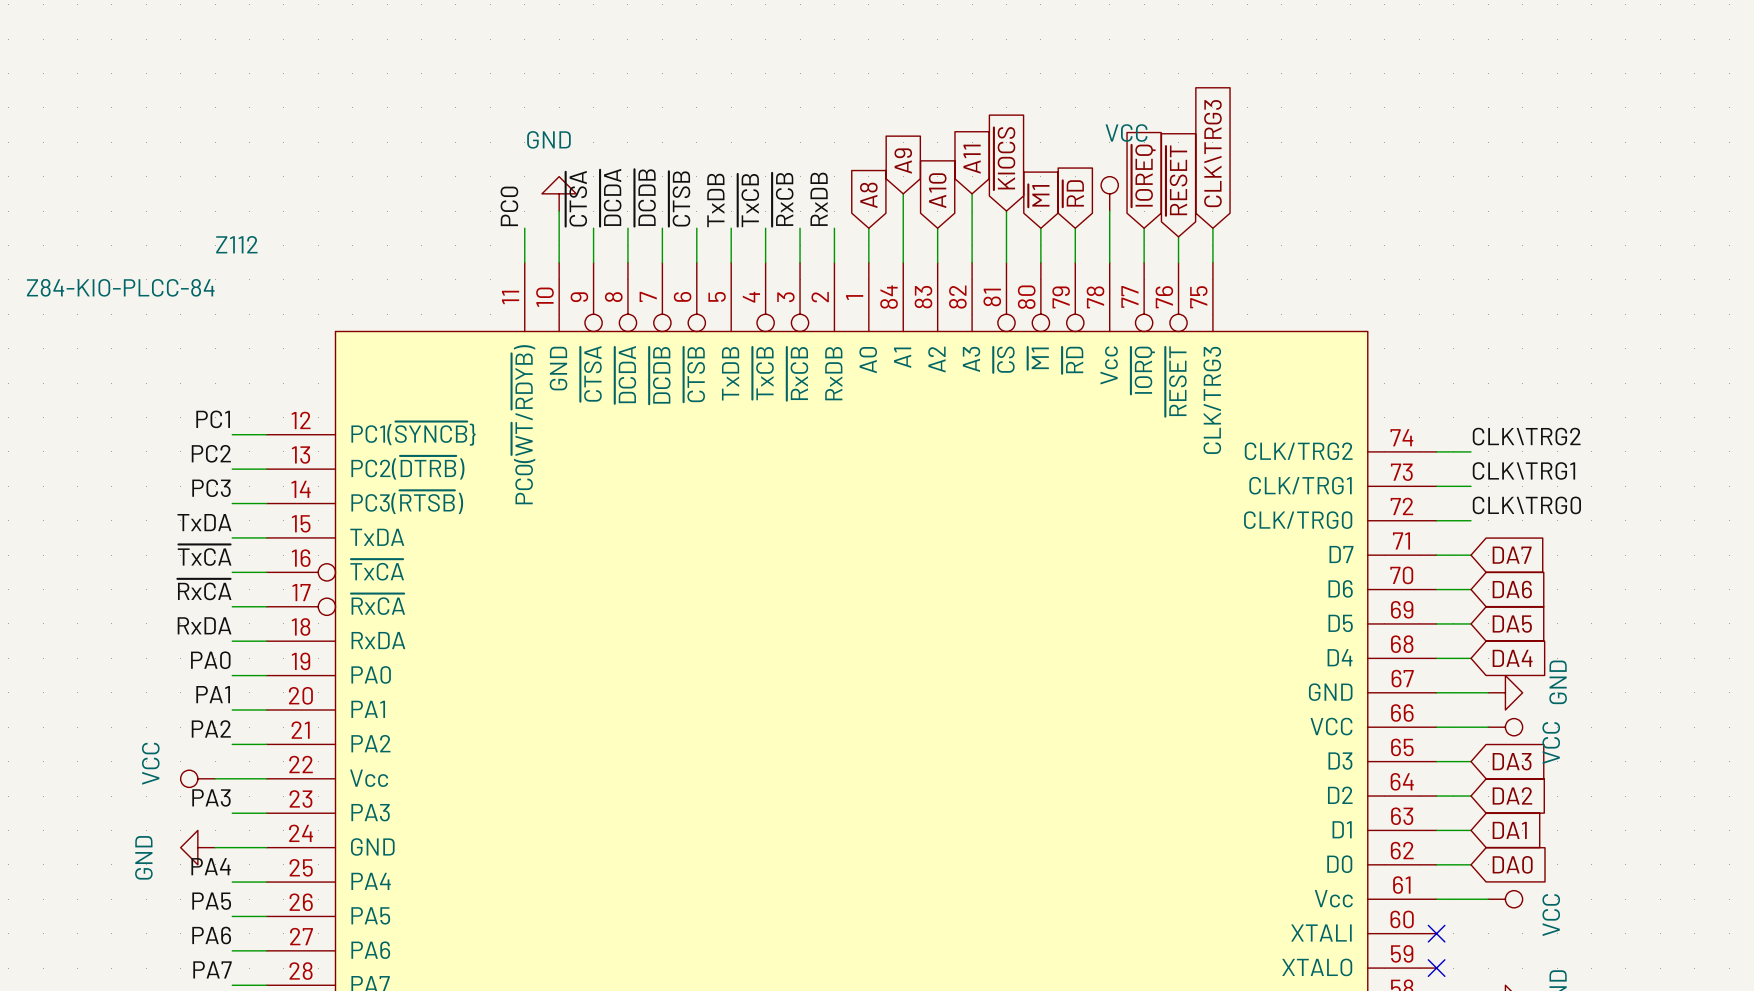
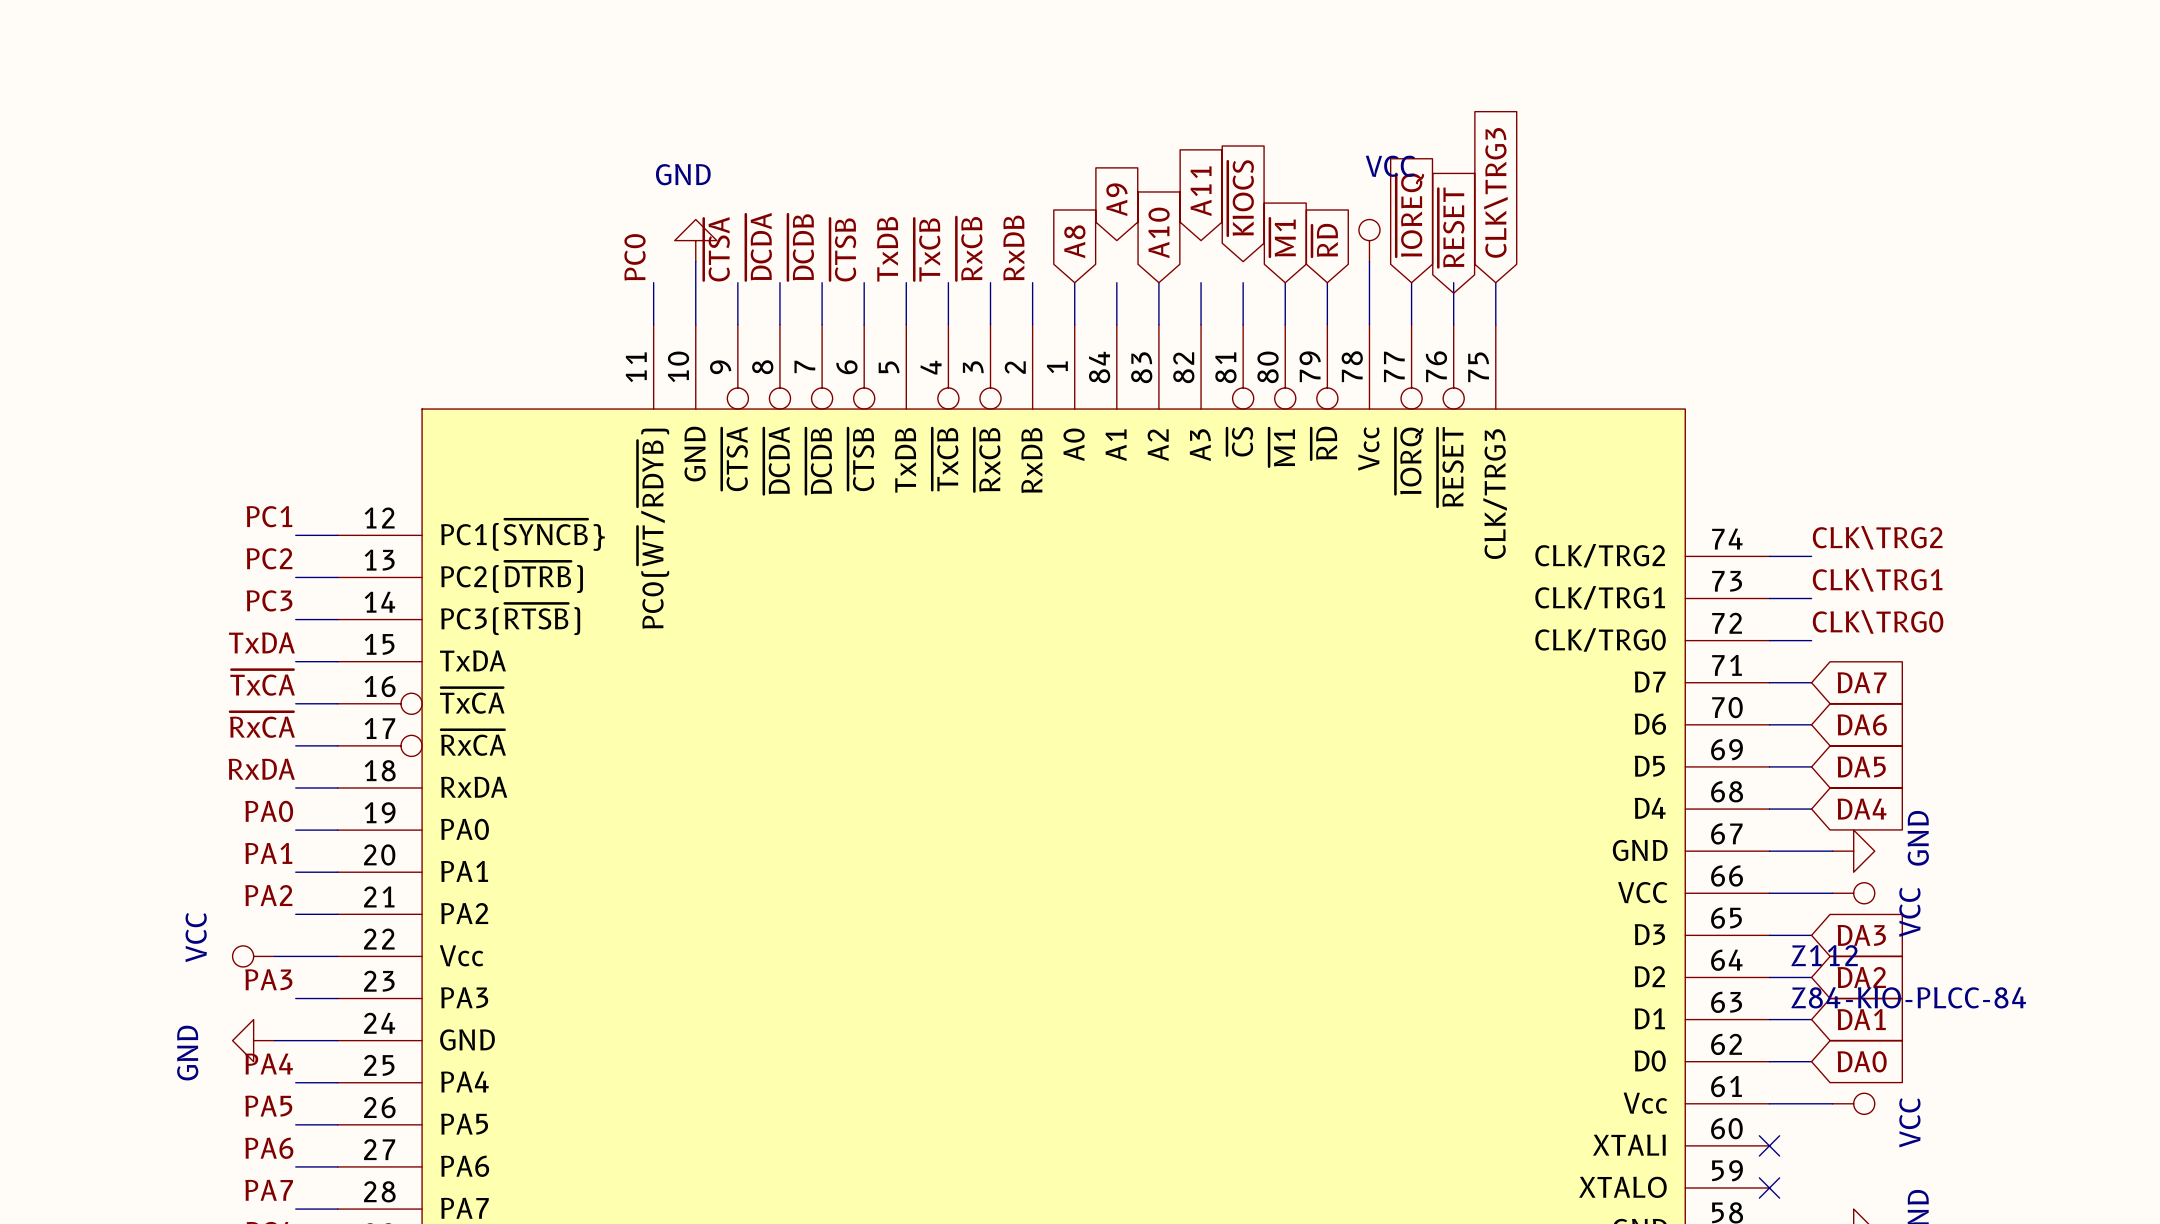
wire: (903, 193) (903, 228) -> none
wire: (972, 193) (972, 228) -> none
wire: (1006, 211) (1006, 228) -> none
wire: none -> (1453, 282) (1453, 293)
Z112 name position: Z112 (236, 244) -> Z112 (1824, 955)
Z112 value position: Z84-KIO-PLCC-84 (120, 287) -> Z84-KIO-PLCC-84 (1908, 997)

